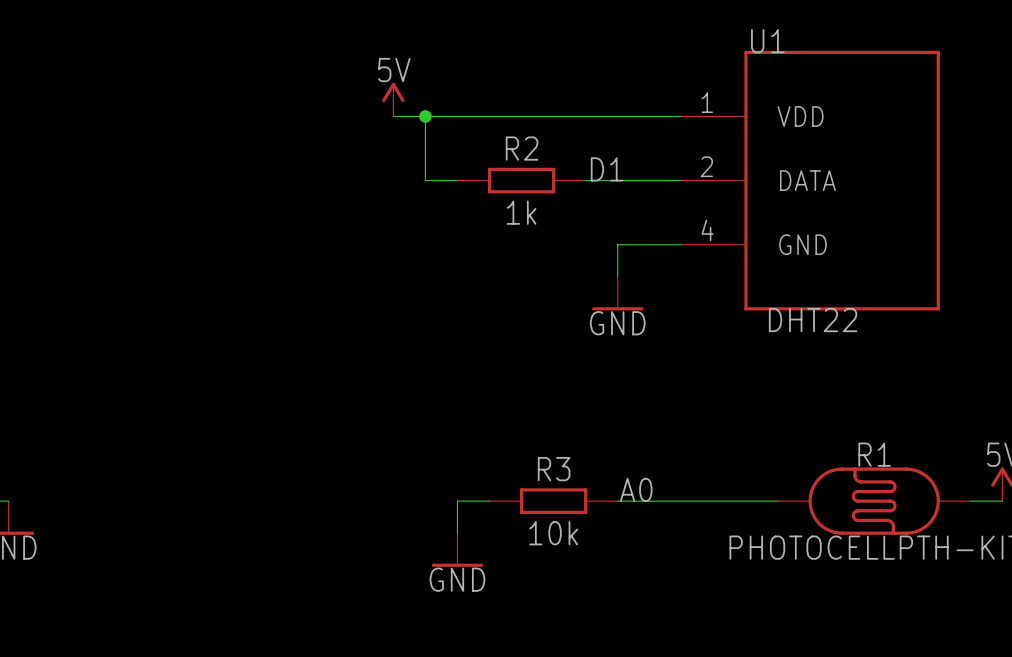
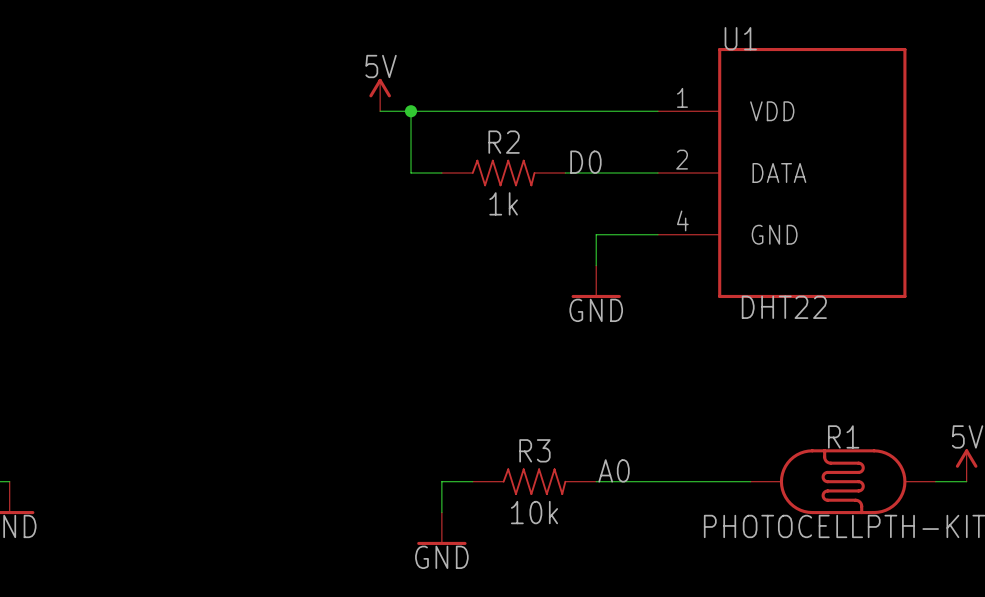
R2 symbol: [457, 167, 586, 194] -> [441, 159, 566, 187]
label: D1 (607, 169) -> D0 (585, 162)
R3 symbol: [489, 488, 618, 514] -> [472, 468, 597, 495]

